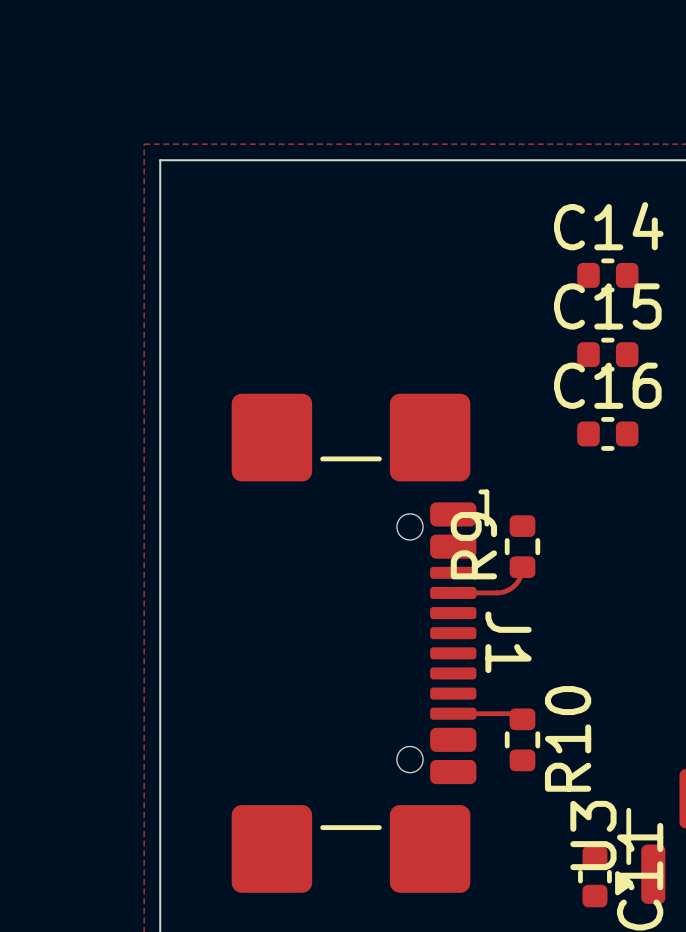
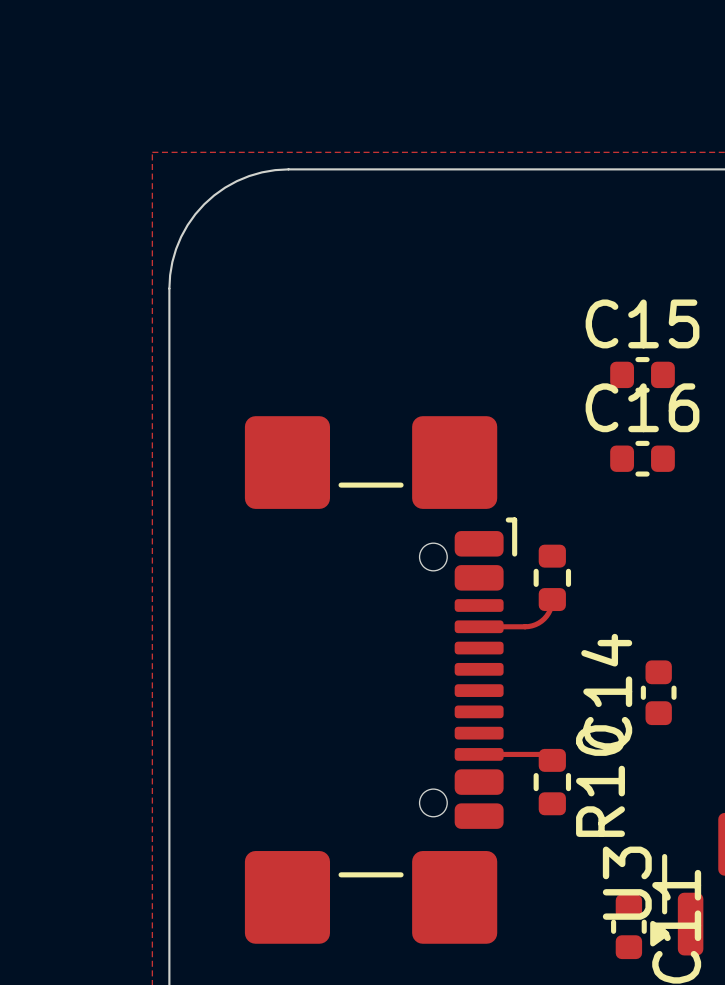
board edge: (272, 160) (160, 160) (160, 272) -> (288, 169) (262, 172) (236, 181) (204, 204) (187, 225) (176, 249) (169, 288)
C14 rotation: 0° (607, 275) -> 90° clockwise (658, 692)
C14 position: (607, 275) -> (658, 692)
R9 name: R9 (473, 545) -> none
J1 name: J1 (508, 642) -> none

